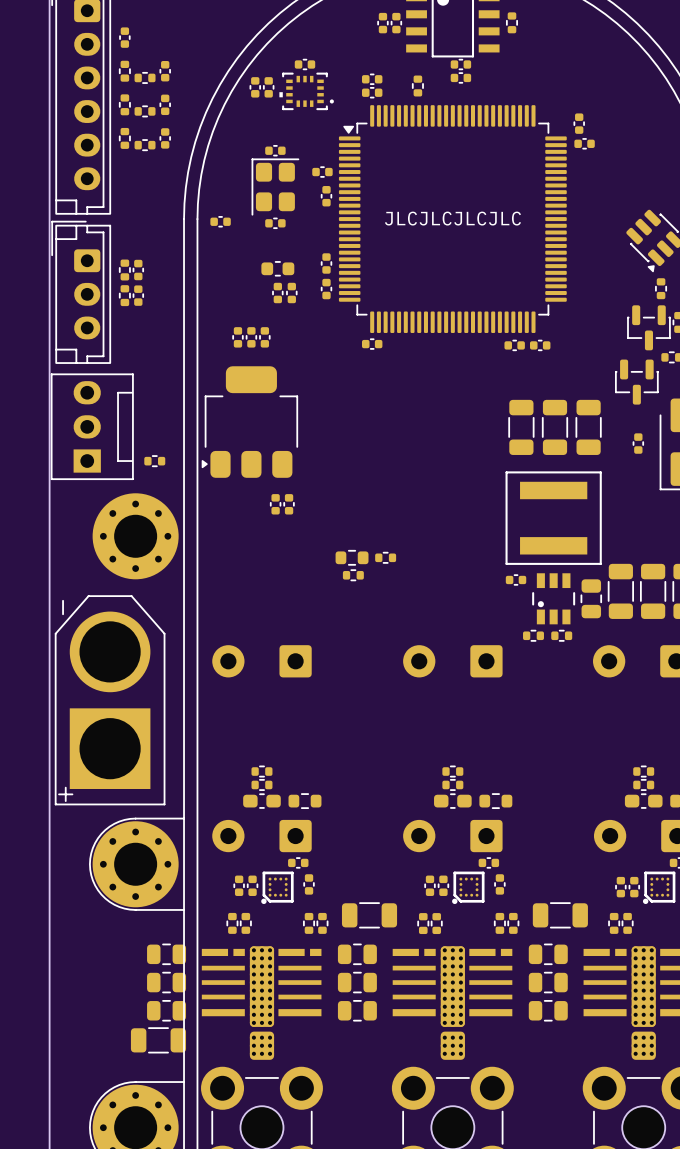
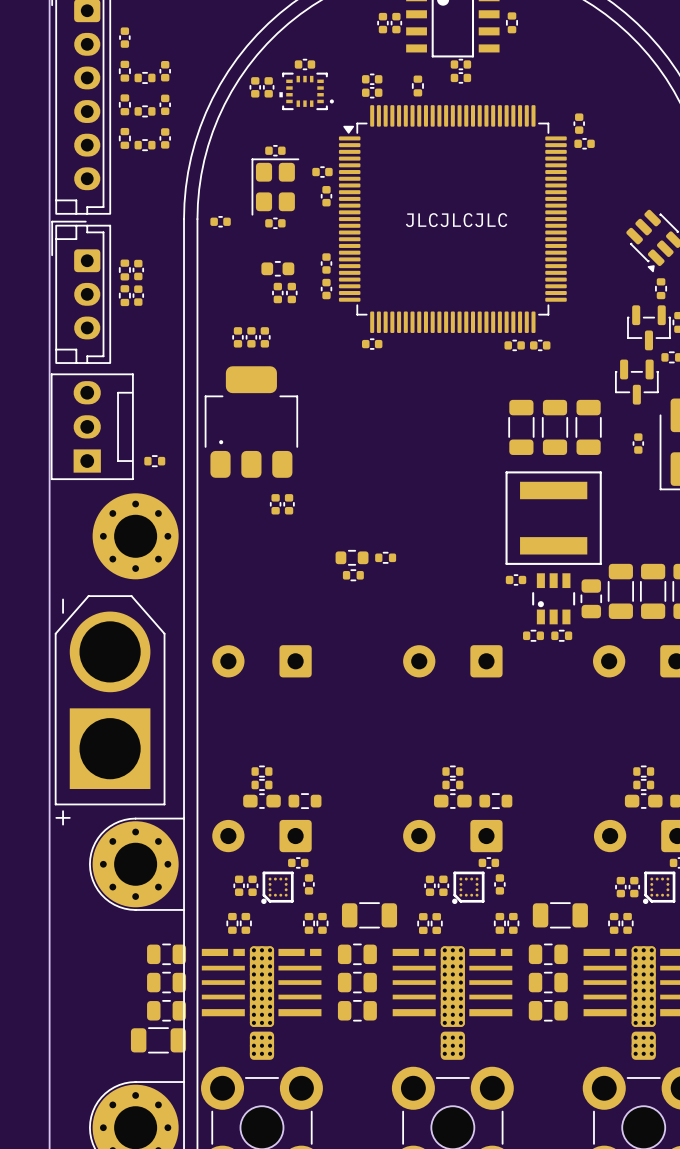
text: JLCJLCJLCJLC (452, 218) -> JLCJLCJLC (456, 220)
part footprint: [201, 366, 299, 478] -> [204, 366, 299, 478]
part footprint: [54, 595, 166, 806] -> [54, 595, 166, 826]

